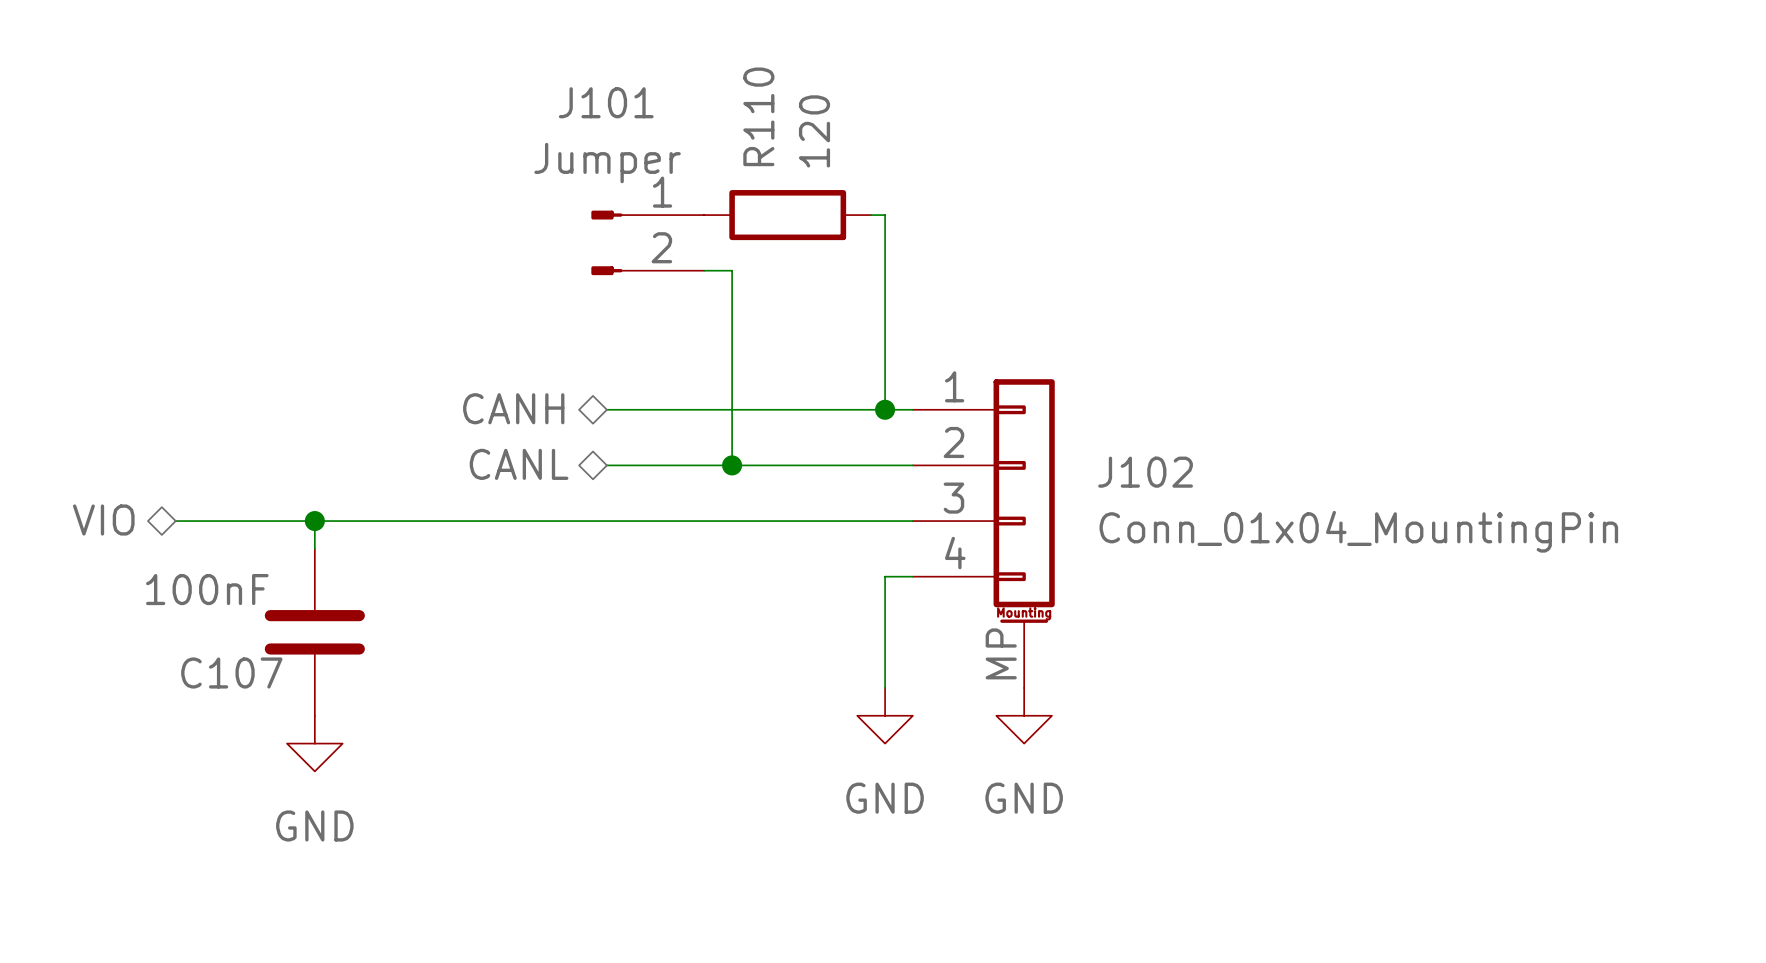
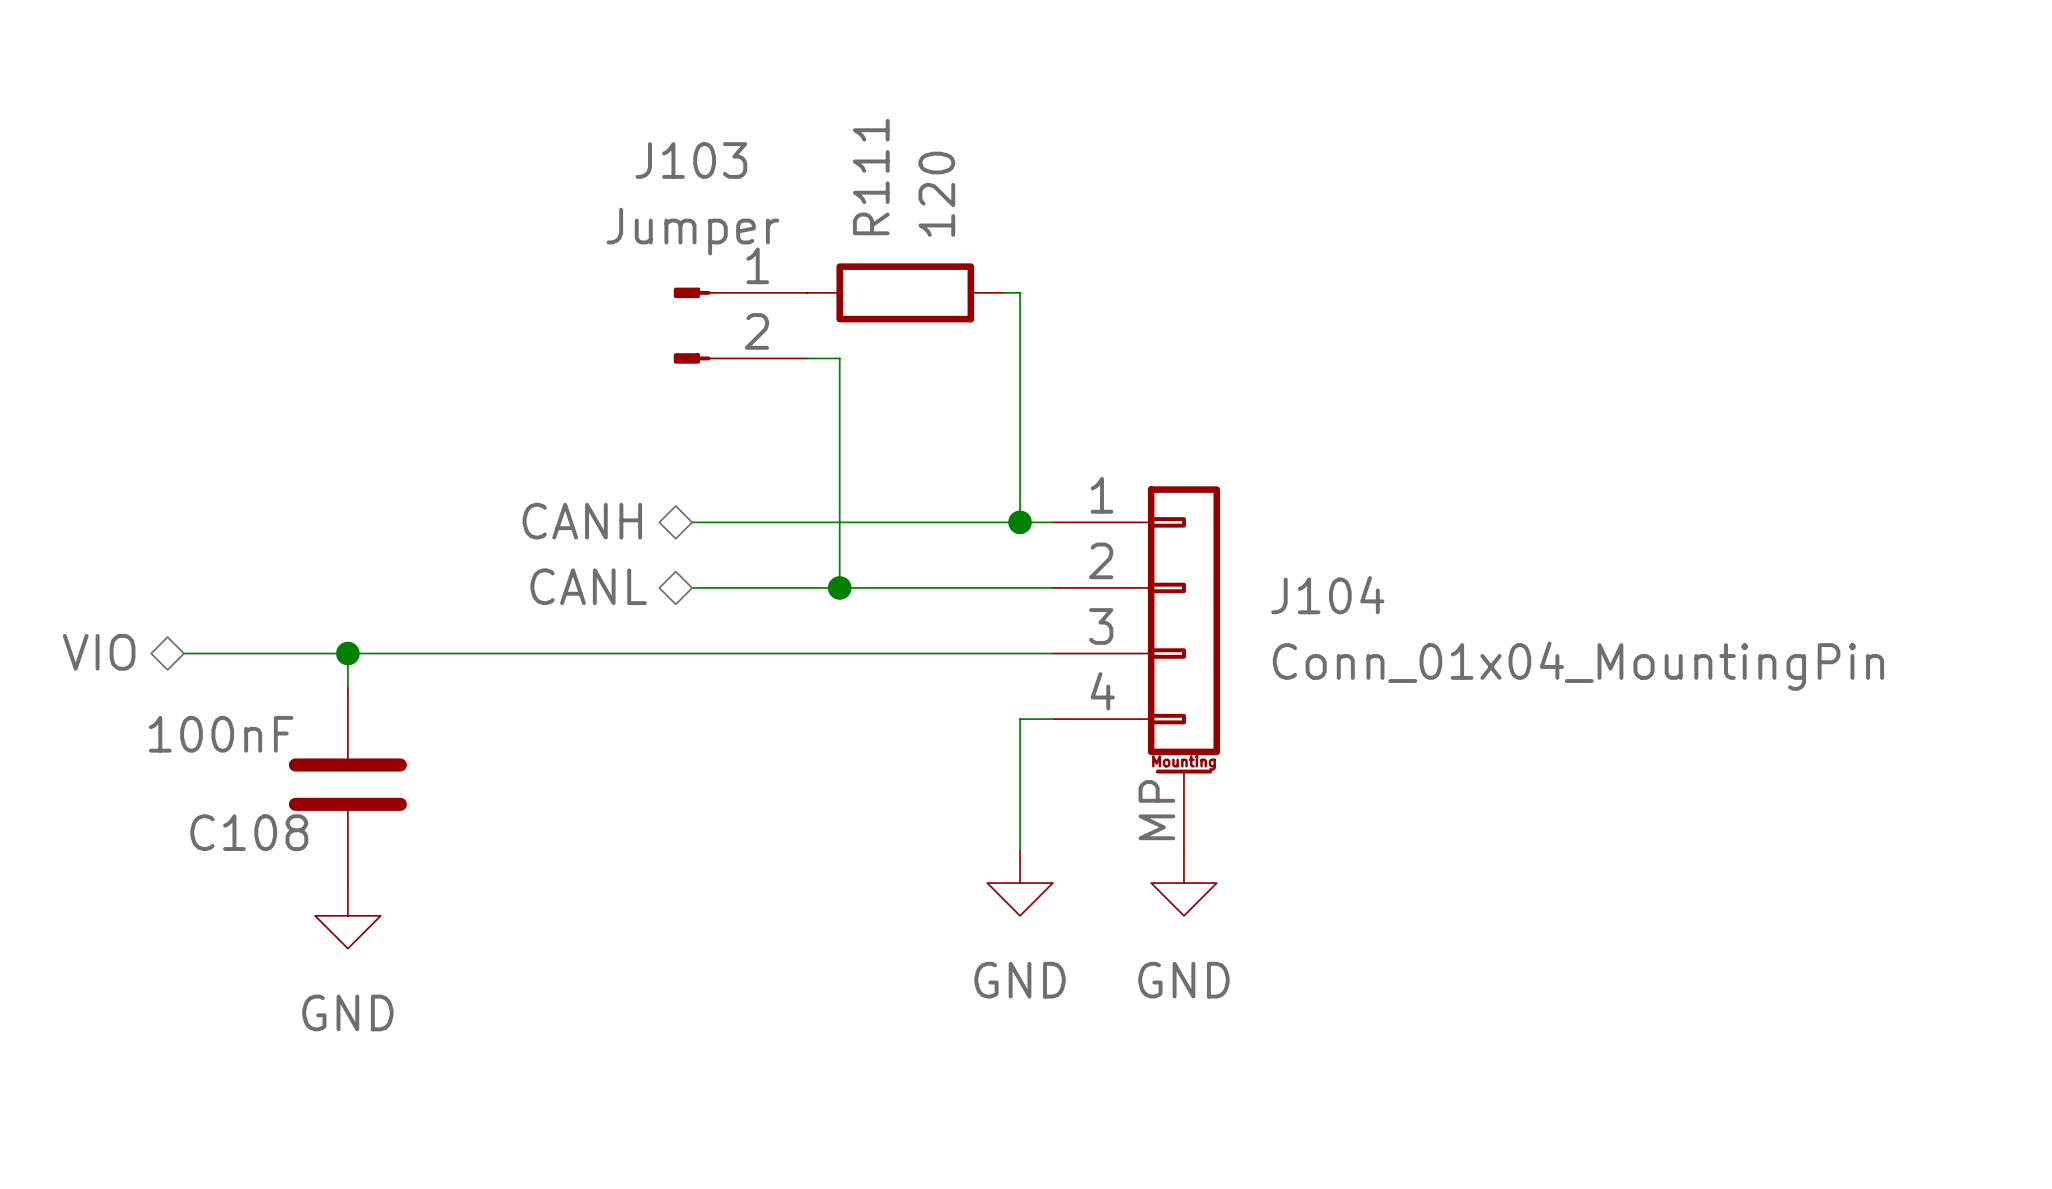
J101 name: J101 (606, 102) -> J103 (691, 160)
R110 name: R110 (758, 116) -> R111 (871, 177)
J102 name: J102 (1145, 472) -> J104 (1327, 595)
C107 name: C107 (231, 672) -> C108 (249, 832)

